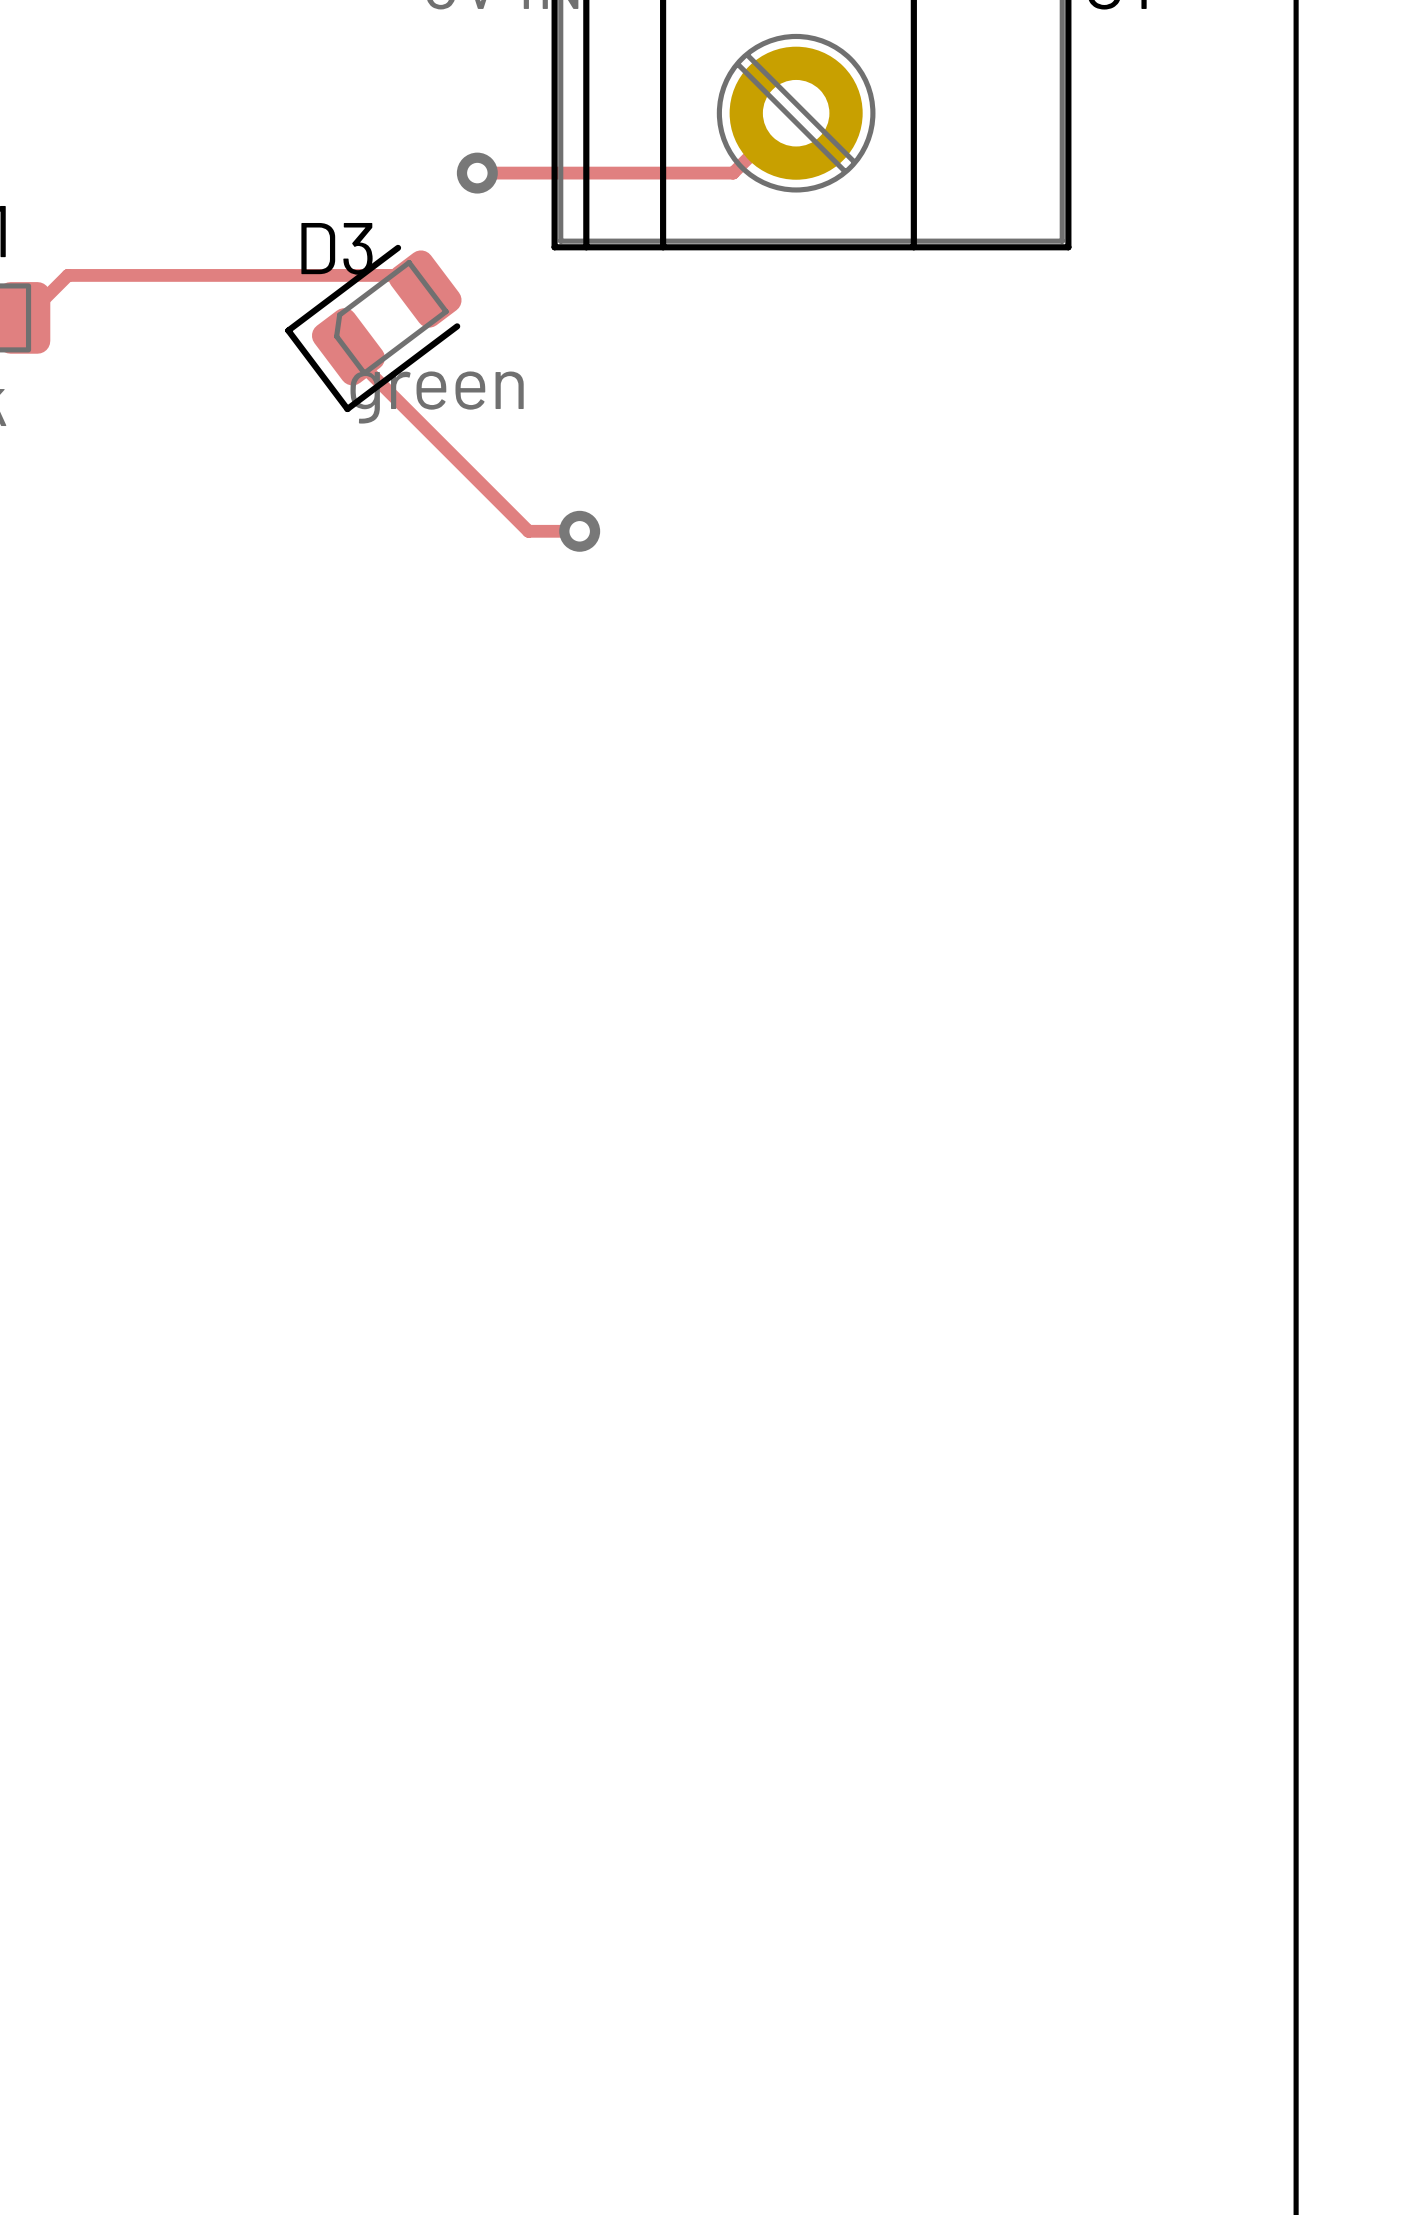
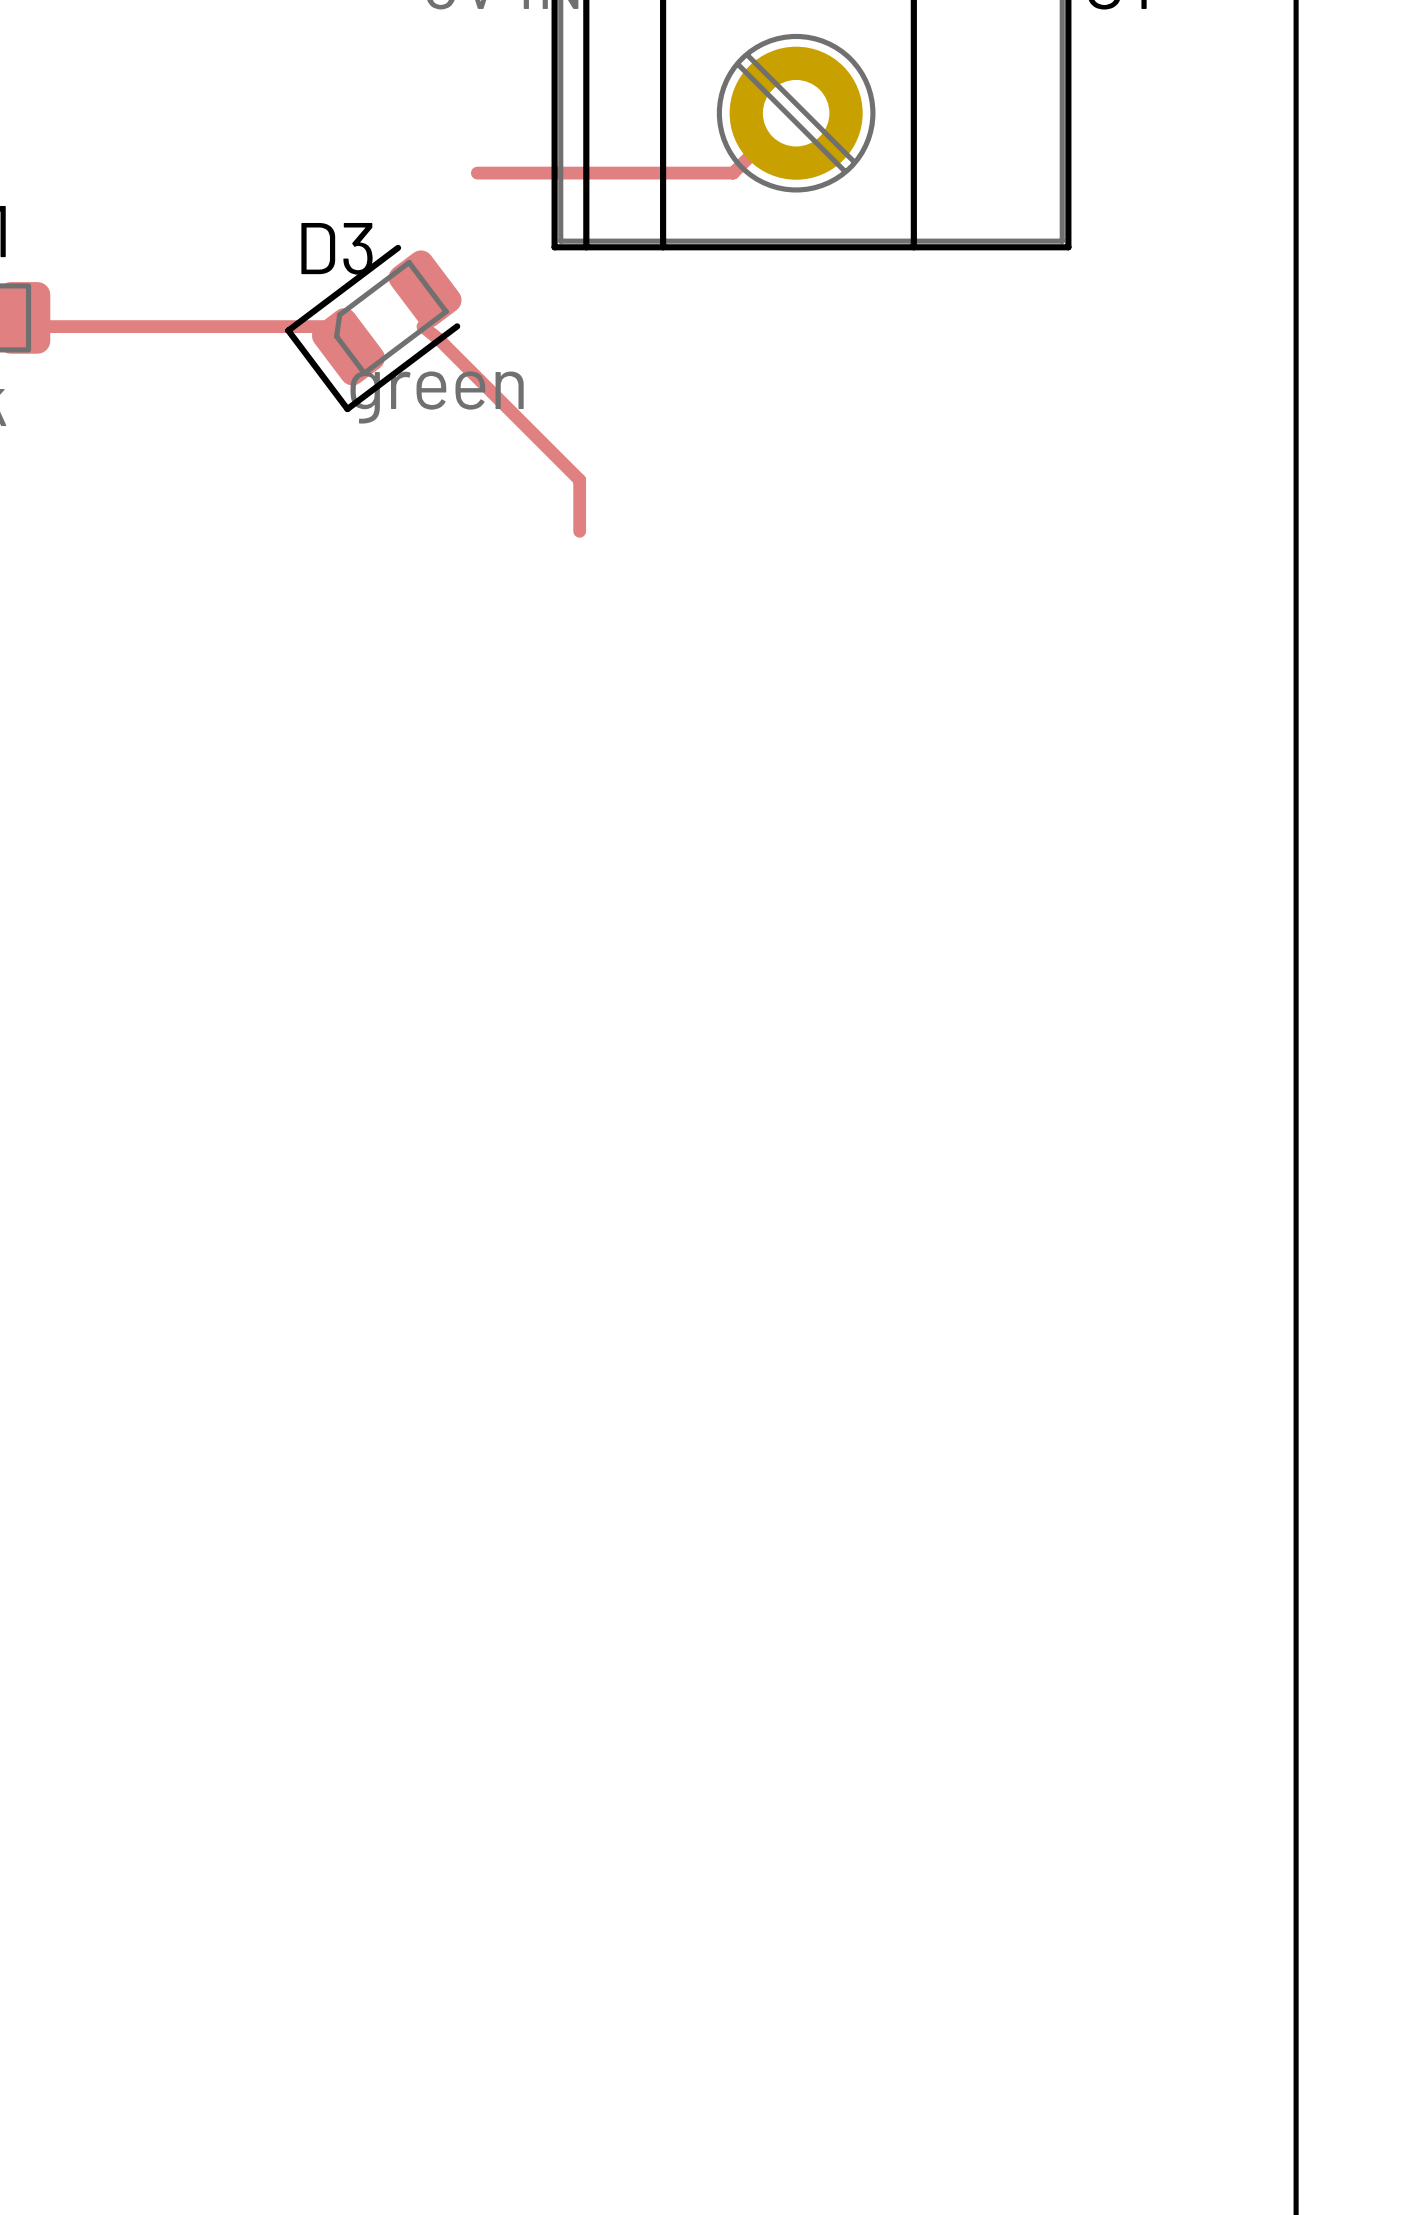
via: (477, 173) -> none
track: (425, 289) (413, 275) (67, 275) (24, 317) -> none
track: none -> (12, 326) (327, 326)
track: (348, 346) (362, 364) (528, 531) (579, 531) -> (422, 326) (438, 339) (579, 480) (579, 531)
via: (579, 531) -> none

